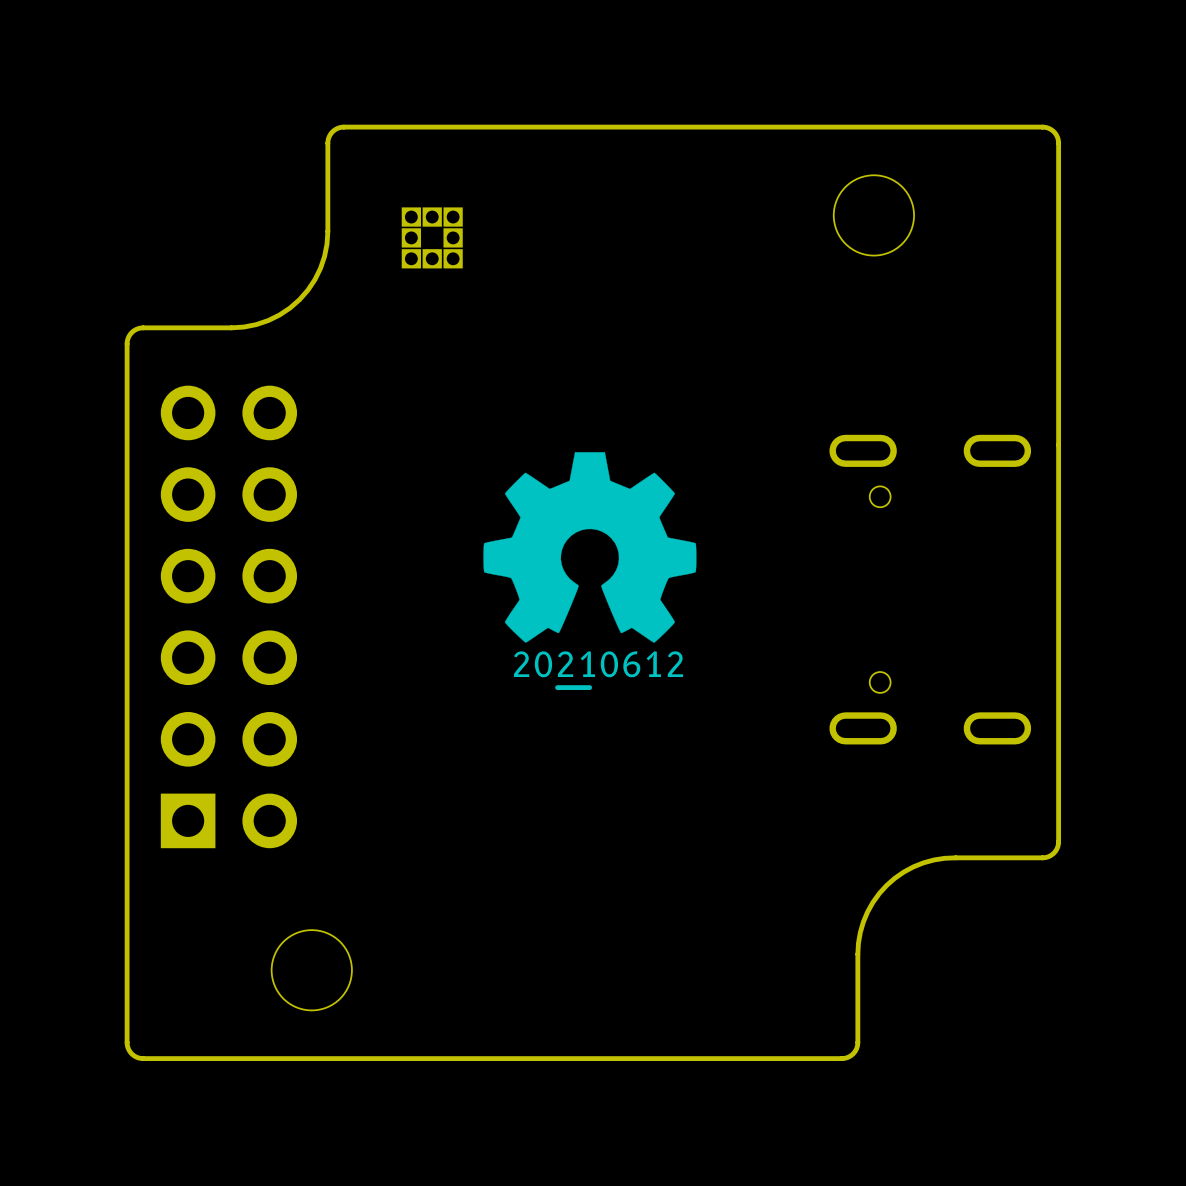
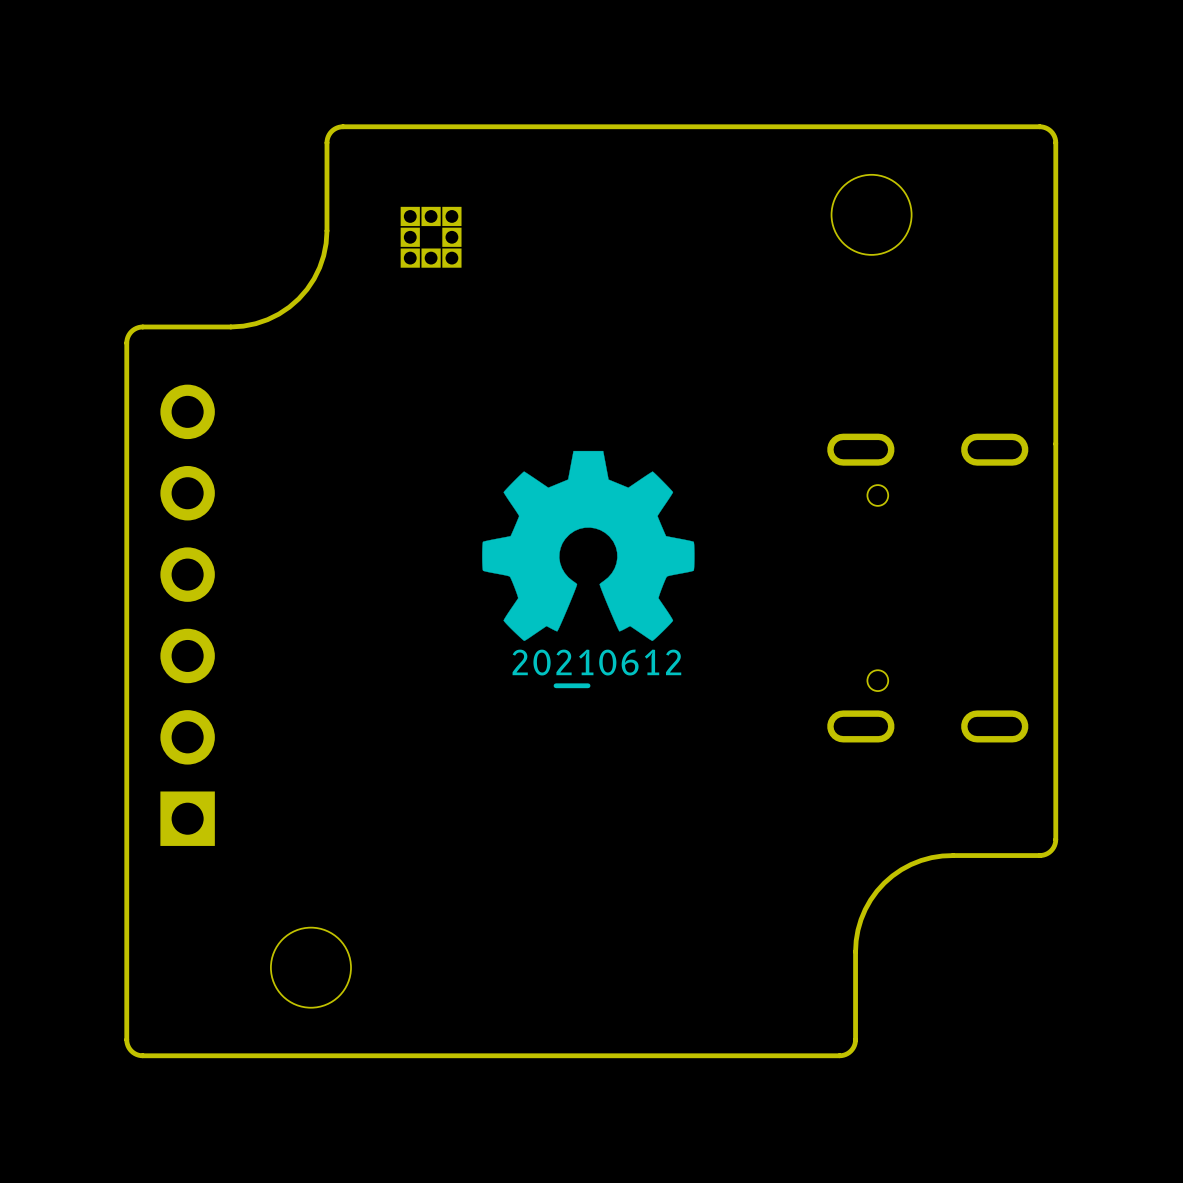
part: (228, 616) -> none

